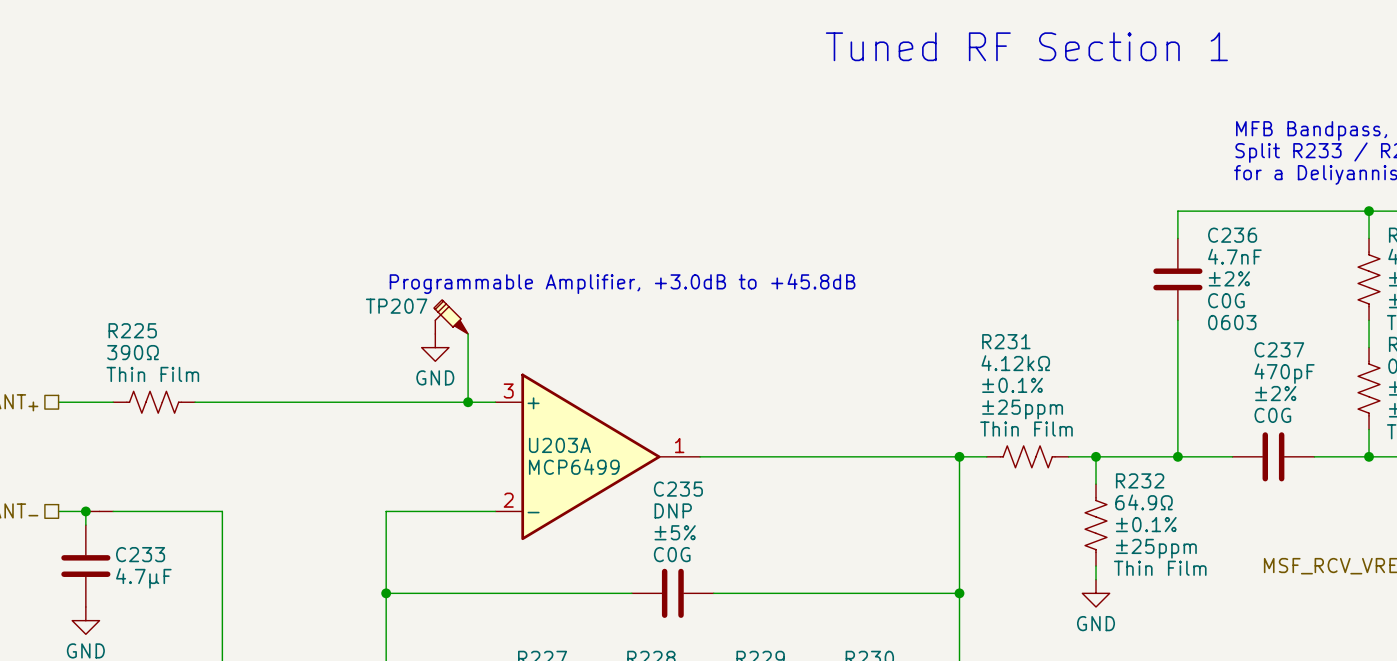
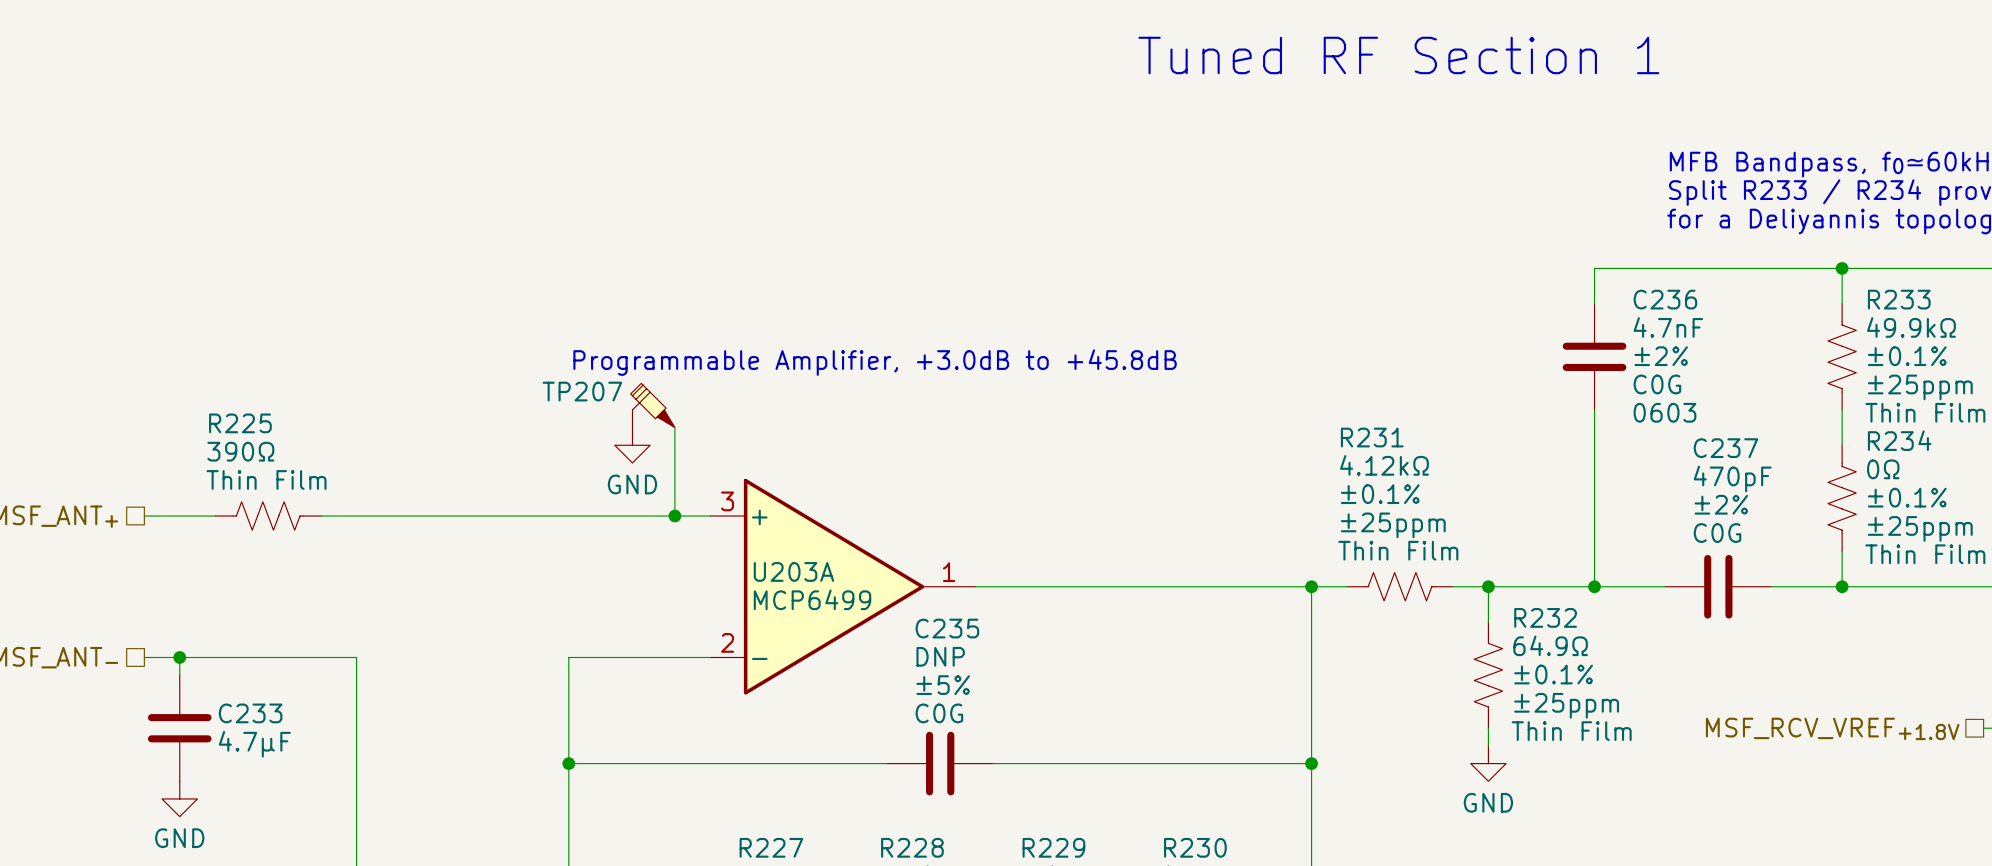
part: (99, 511) -> none

